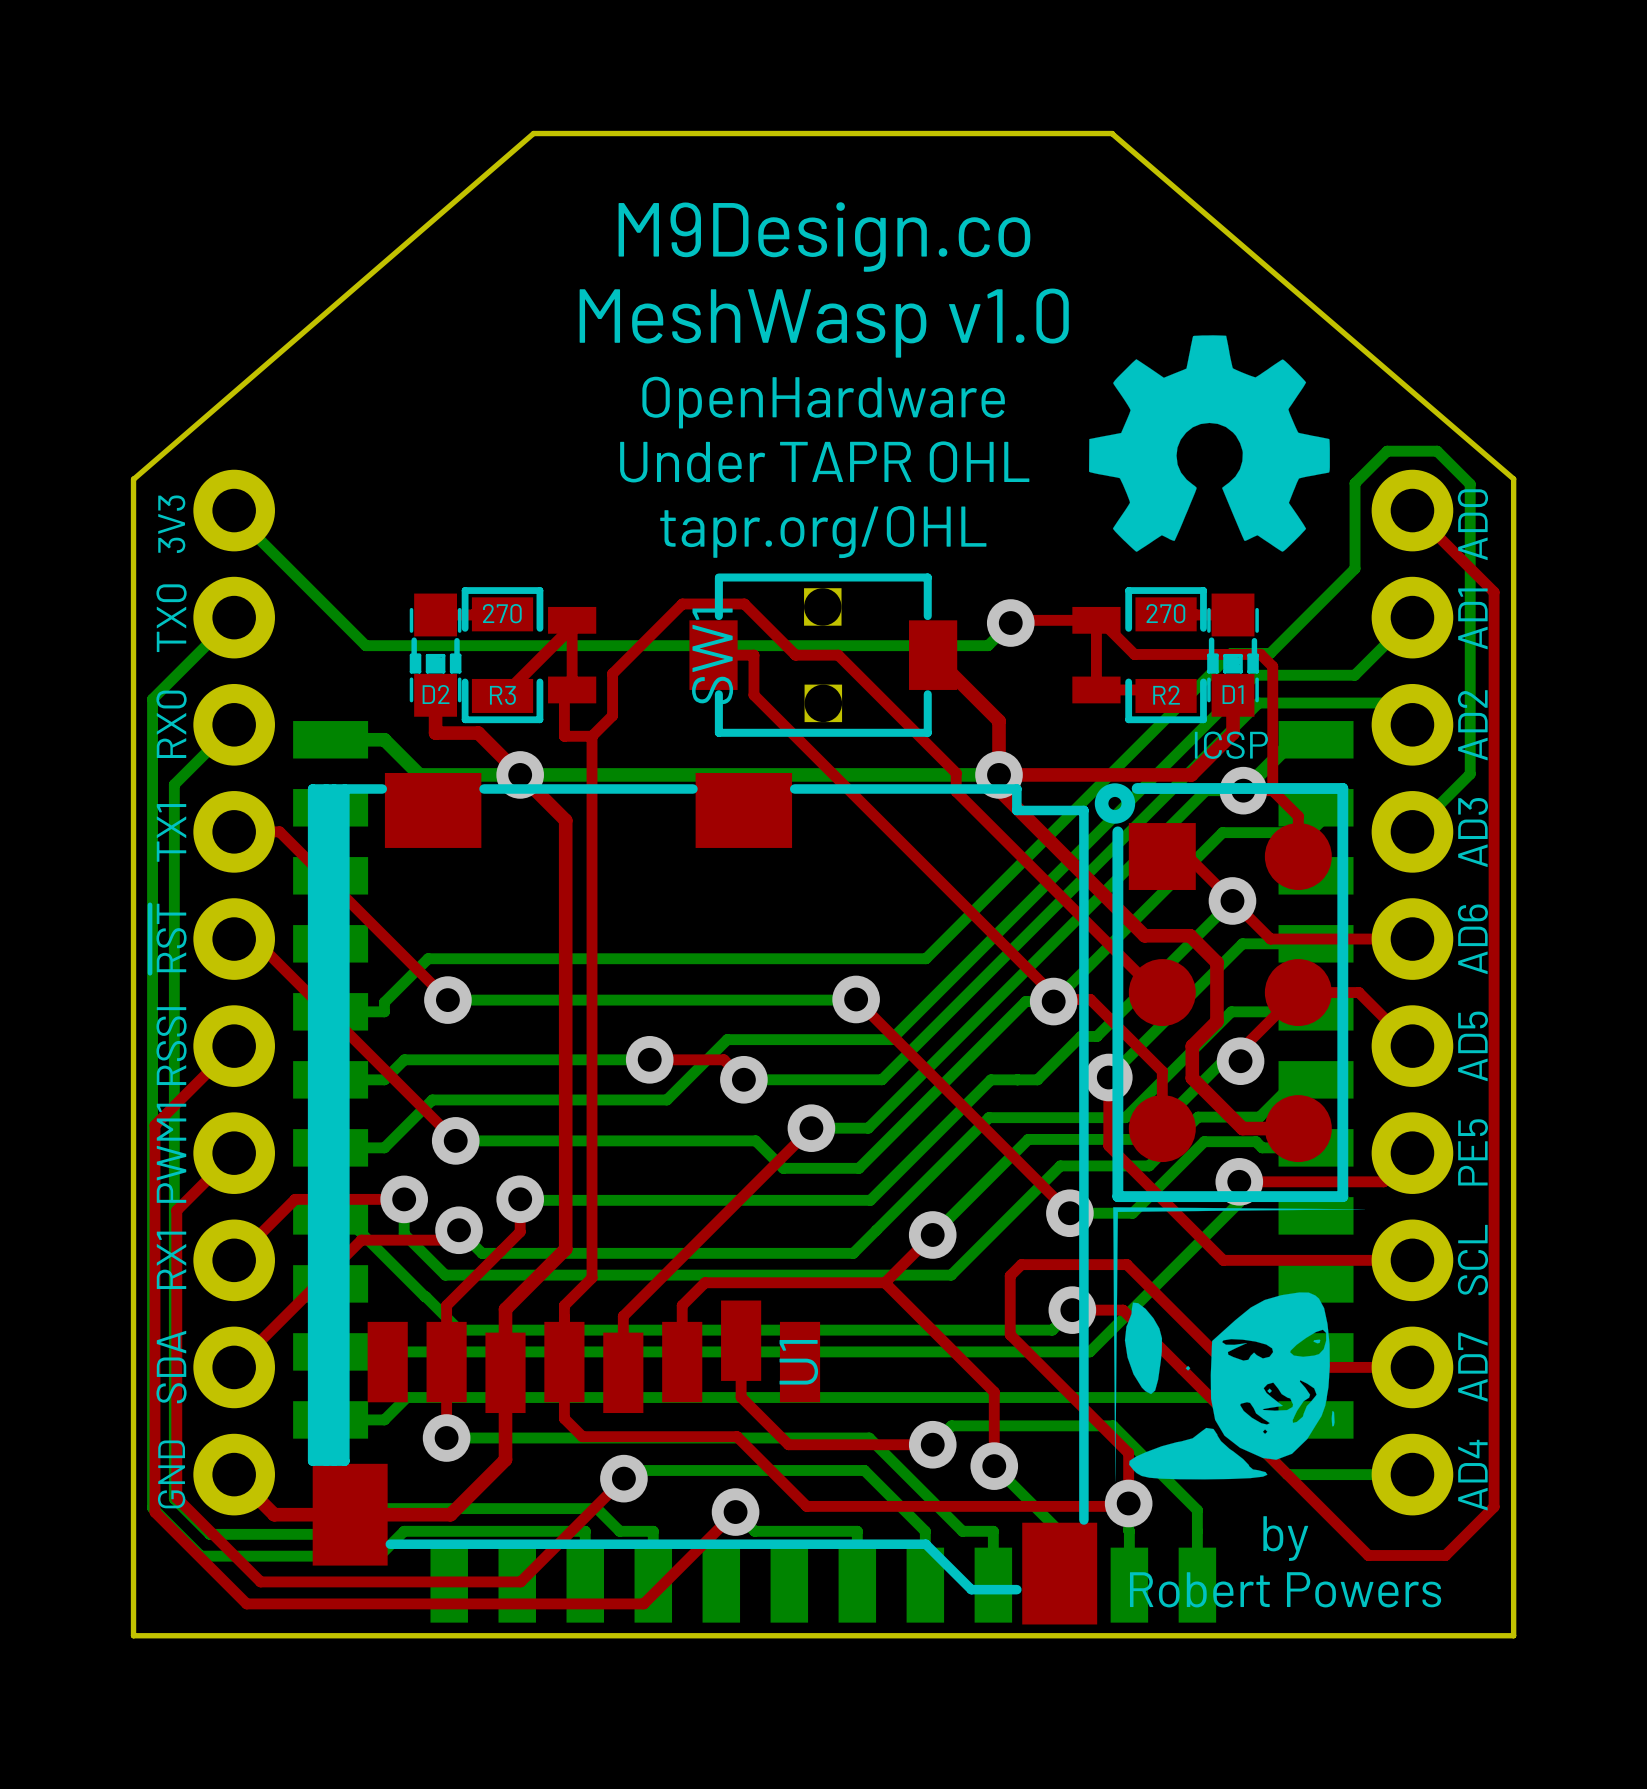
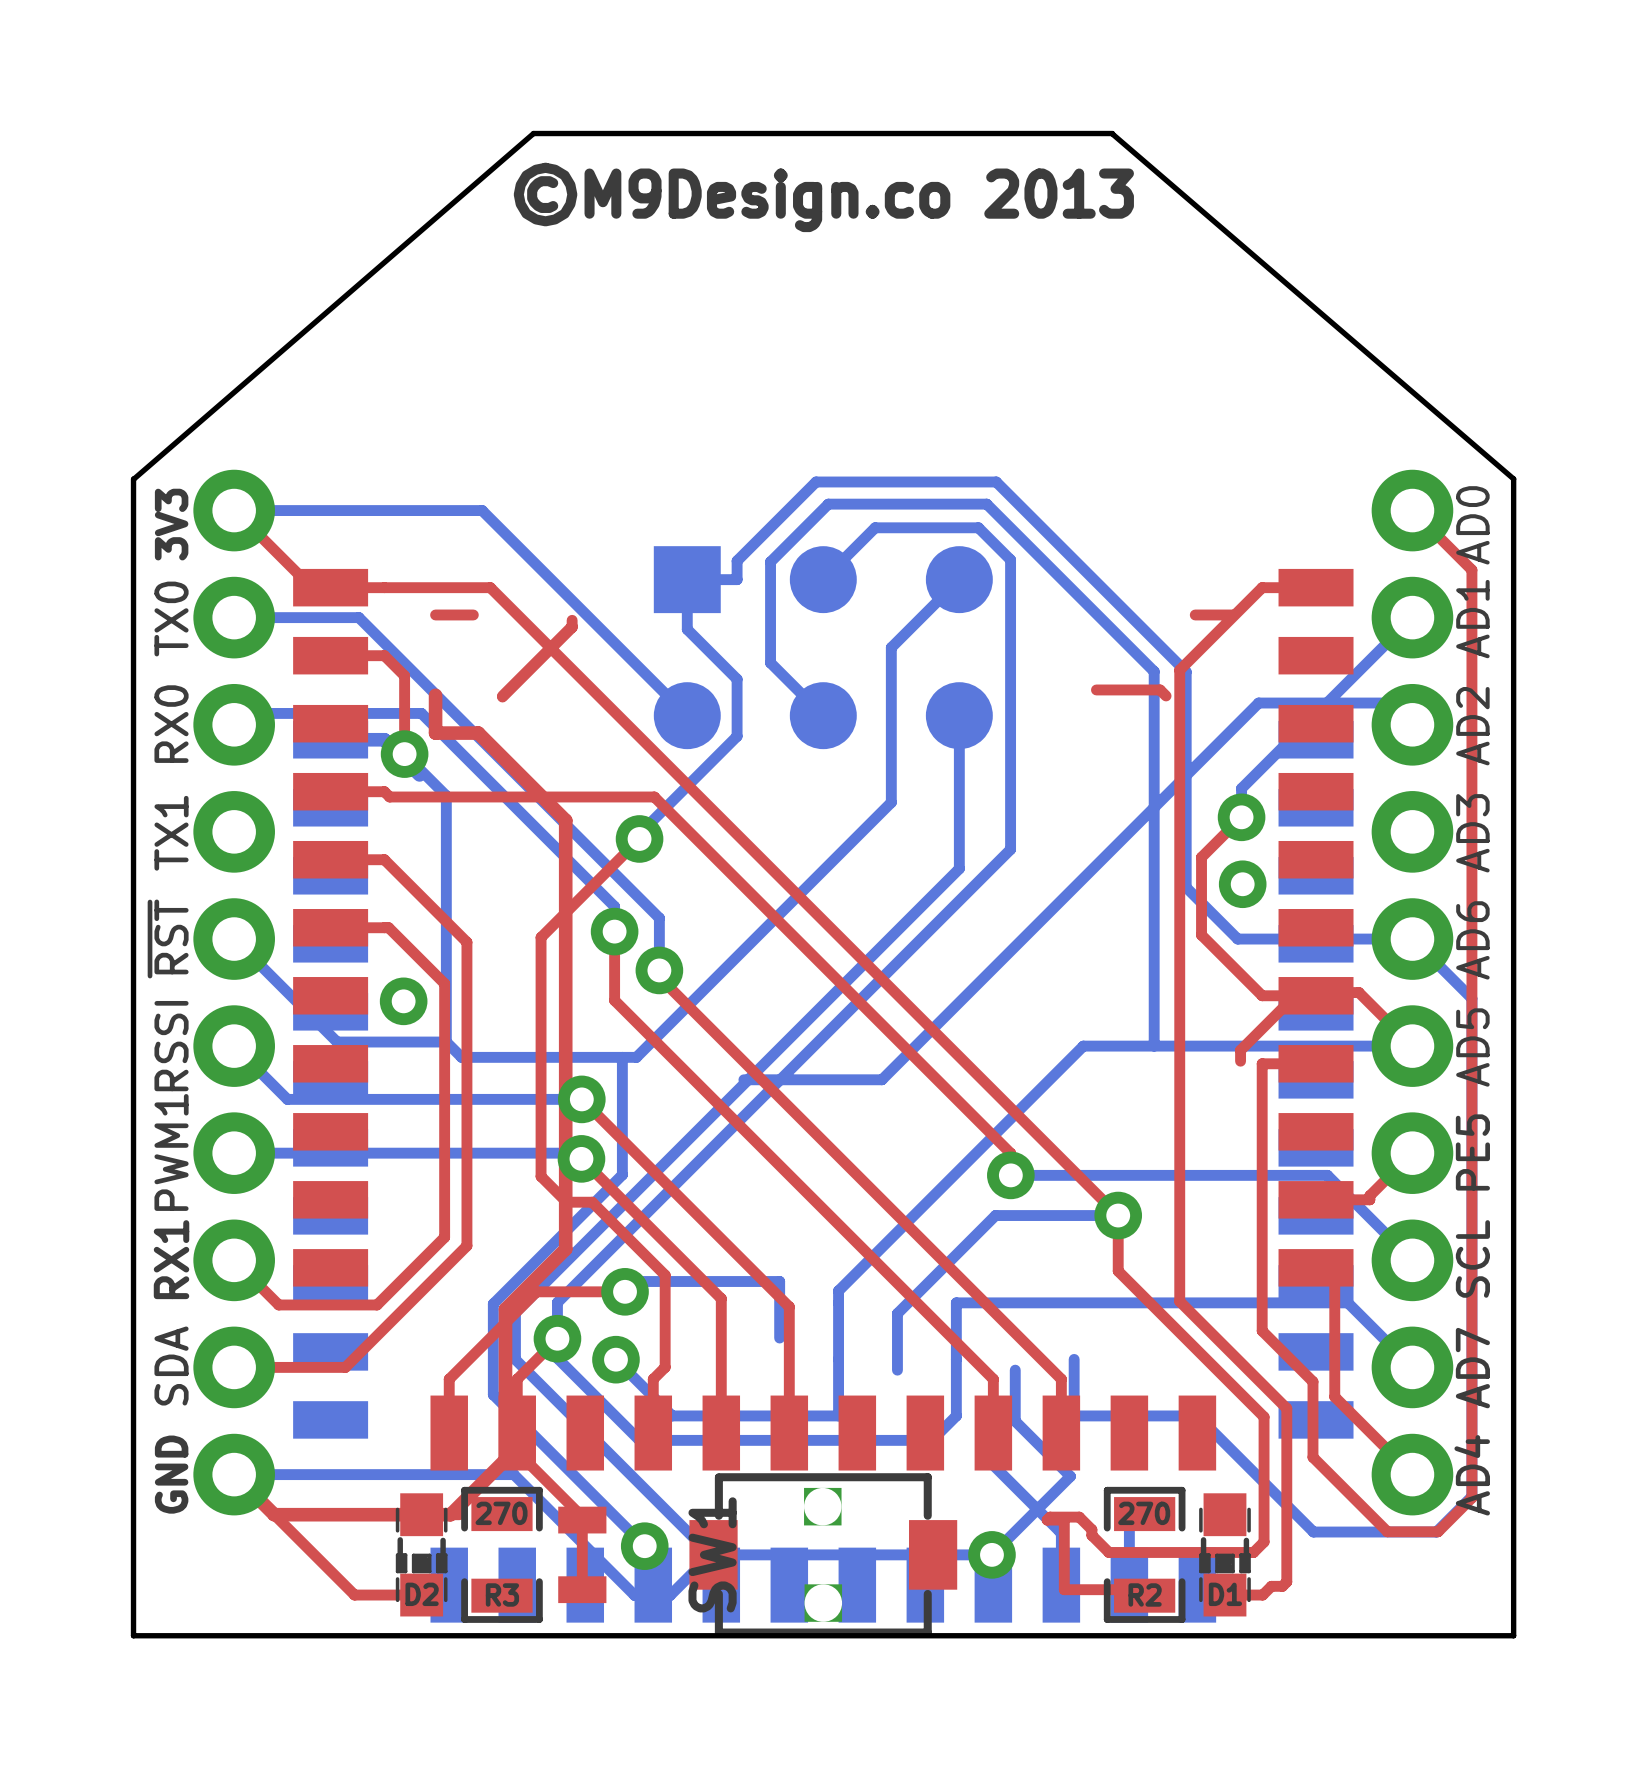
text: M9Design.co (824, 237) -> ©M9Design.co 2013 (823, 197)
text: MeshWasp v1.0 (824, 323) -> none
drawing: [1088, 335, 1330, 552] -> none
text: OpenHardware (823, 402) -> none
text: Under TAPR OHL (824, 461) -> none
bottom track: (234, 510) (234, 514) (365, 645) (988, 645) (1010, 623) -> (234, 510) (482, 510) (687, 715)
top track: none -> (234, 510) (311, 587) (490, 587) (1118, 1215) (1118, 1271) (1264, 1416) (1264, 1542) (1253, 1552) (1108, 1552) (1091, 1535) (1091, 1529) (1079, 1517) (1050, 1517) (1047, 1520) (1064, 1520) (1064, 1589) (1138, 1589)
text: tapr.org/OHL (823, 532) -> none
top track: (1471, 570) (1494, 592) (1494, 1506) (1445, 1555) (1368, 1555) (1123, 1310) (1072, 1310) -> (1471, 570) (1471, 1497) (1438, 1531) (1387, 1531) (1312, 1457) (1312, 1381) (1262, 1330) (1262, 1063) (1334, 1063)
bottom track: none -> (823, 579) (875, 527) (978, 527) (1010, 559) (1010, 849) (557, 1302) (557, 1358) (639, 1440) (931, 1440) (956, 1415) (956, 1302) (1347, 1302) (1412, 1367)
bottom track: none -> (959, 579) (891, 647) (891, 802) (636, 1057) (461, 1057) (446, 1042)
top track: none -> (1334, 587) (1262, 587) (1179, 670) (1179, 1301) (1286, 1408) (1286, 1581) (1282, 1586) (1271, 1586) (1262, 1595) (1224, 1595)
bottom track: (234, 617) (152, 699) (152, 1507) (200, 1556) (379, 1556) (404, 1531) (585, 1531) (585, 1603) -> (234, 617) (358, 617) (659, 918) (659, 970)
top track: (1010, 623) (1013, 620) (1100, 620) (1134, 654) (1260, 654) (1272, 666) (1272, 790) -> none
via: (1010, 623) -> none
top track: none -> (311, 655) (384, 655) (404, 675) (404, 754)
D2 position: (435, 655) -> (421, 1554)
R3 position: (502, 655) -> (501, 1554)
part: (572, 655) -> none
top track: (713, 655) (753, 655) (753, 695) (1057, 998) -> none
SW1 position: (823, 655) -> (823, 1554)
part: (1096, 655) -> none
R2 position: (1166, 655) -> (1144, 1554)
D1 position: (1233, 655) -> (1224, 1554)
bottom track: (1354, 675) (1255, 675) (891, 1039) (727, 1039) (666, 1099) (432, 1099) (384, 1147) (311, 1147) -> (1354, 675) (1241, 788) (1241, 817)
top track: (572, 689) (564, 697) (564, 736) (592, 736) -> none
top track: (1233, 695) (1233, 733) (1191, 774) (999, 774) -> none
bottom track: none -> (823, 715) (770, 662) (770, 561) (828, 504) (986, 504) (1154, 671) (1154, 1046)
bottom track: none -> (959, 715) (959, 868) (515, 1312) (515, 1359) (710, 1554)
top track: (999, 721) (933, 655) (999, 721) -> none
top track: (999, 721) (999, 790) (1144, 935) (1190, 935) (1216, 962) (1216, 1021) (1192, 1046) (1192, 1078) (1242, 1128) (1298, 1128) -> none
bottom track: (234, 724) (174, 784) (174, 1498) (209, 1534) (357, 1534) (383, 1508) (597, 1508) (619, 1531) (653, 1531) (653, 1603) -> (234, 724) (245, 713) (421, 713) (614, 906) (614, 931)
top track: (592, 736) (592, 1277) (564, 1305) (564, 1418) (582, 1436) (737, 1436) (806, 1506) (1125, 1506) (1128, 1503) (1128, 1453) (1010, 1334) (1010, 1275) (1021, 1264) (1126, 1264) (1229, 1367) (1412, 1367) -> none
top track: (592, 736) (612, 715) (612, 673) (682, 603) (744, 603) (795, 655) (838, 655) (956, 773) (956, 791) (1157, 992) (1162, 992) -> none
bottom track: (384, 739) (419, 774) (999, 774) -> none
bottom track: (1334, 739) (1294, 739) (1243, 790) (1205, 790) (868, 1128) (811, 1128) -> none
bottom track: none -> (404, 754) (446, 795) (446, 1042)
via: none -> (404, 754)
via: (520, 774) -> none
via: (999, 774) -> none
via position: (1243, 790) -> (1241, 817)
top track: (1272, 790) (1298, 816) (1298, 856) -> none
top track: none -> (311, 791) (384, 791) (389, 796) (654, 796) (1010, 1153) (1010, 1175)
bottom track: (1334, 807) (1309, 832) (1222, 832) (1053, 1001) (1025, 1001) (858, 1168) (783, 1168) (755, 1140) (455, 1140) -> none
top track: none -> (1241, 817) (1201, 857) (1201, 935) (1262, 995) (1334, 995)
top track: (234, 831) (279, 831) (447, 1000) -> none
bottom track: (1412, 831) (1470, 774) (1470, 484) (1437, 451) (1387, 451) (1355, 483) (1355, 568) (1270, 653) (1231, 653) (926, 958) (428, 958) (384, 1002) (384, 1011) (311, 1011) -> none
bottom track: none -> (639, 838) (639, 833) (737, 736) (737, 679) (687, 629) (687, 579) (737, 579) (737, 560) (816, 481) (996, 481) (1186, 671) (1186, 887) (1237, 939) (1412, 939) (1471, 998) (1471, 1496) (1436, 1532) (1313, 1532) (1197, 1415) (1074, 1415) (1074, 1359)
top track: none -> (639, 838) (541, 937) (541, 1176) (566, 1202) (592, 1202) (665, 1275) (665, 1367) (653, 1379) (653, 1451)
via: none -> (639, 838)
top track: (1162, 856) (1188, 856) (1270, 939) (1412, 939) -> none
bottom track: (1232, 900) (1096, 1036) (1080, 1036) (1037, 1079) (990, 1079) (870, 1200) (520, 1199) -> none
via position: (1232, 900) -> (1242, 884)
top track: none -> (614, 931) (614, 1000) (993, 1379) (993, 1451)
via: none -> (614, 931)
bottom track: none -> (234, 939) (337, 1042) (446, 1042)
top track: (234, 939) (253, 939) (455, 1140) -> none
bottom track: (1334, 943) (1242, 943) (1108, 1077) -> none
top track: none -> (659, 970) (659, 977) (1061, 1379) (1061, 1451)
via: none -> (659, 970)
part side: top (1221, 992) -> bottom (823, 647)
top track: (1057, 998) (1090, 999) (1162, 1071) (1162, 1128) -> none
top track: (856, 999) (1069, 1213) -> none
via: (856, 999) -> none
bottom track: (447, 1000) (855, 1000) -> none
via position: (447, 1000) -> (403, 1001)
via: (1053, 1001) -> none
bottom track: (1334, 1011) (1231, 1011) (1125, 1117) (989, 1117) (853, 1253) (482, 1253) (459, 1230) -> none
part: none -> (823, 1019)
bottom track: none -> (234, 1046) (287, 1099) (581, 1099)
top track: (234, 1046) (154, 1125) (154, 1512) (246, 1603) (643, 1603) (735, 1512) -> none
bottom track: none -> (1412, 1046) (1083, 1046) (838, 1290) (838, 1415) (672, 1415) (615, 1359)
bottom track: none -> (622, 1057) (622, 1174) (493, 1303) (493, 1394) (644, 1546)
bottom track: (649, 1059) (404, 1059) (384, 1079) (311, 1079) -> none
top track: (649, 1059) (723, 1059) (743, 1079) -> none
via: (649, 1059) -> none
bottom track: (1240, 1061) (1223, 1061) (1144, 1139) (1028, 1139) (932, 1234) -> none
via: (1240, 1061) -> none
top track: (1108, 1077) (1108, 1145) (1223, 1260) (1412, 1260) -> none
via: (1108, 1077) -> none
via: (743, 1079) -> none
bottom track: (1334, 1079) (1296, 1079) (1259, 1117) (1198, 1117) (1149, 1165) (1060, 1165) (951, 1275) (445, 1275) (404, 1234) (404, 1199) -> none
top track: none -> (581, 1099) (789, 1306) (789, 1451)
via: none -> (581, 1099)
top track: (811, 1128) (623, 1316) (623, 1372) -> none
via: (811, 1128) -> none
via: (455, 1140) -> none
bottom track: (1334, 1147) (1262, 1147) (1256, 1141) (1204, 1141) (1132, 1213) (1069, 1213) -> none
bottom track: none -> (234, 1153) (575, 1153) (581, 1158)
top track: (234, 1153) (176, 1210) (176, 1498) (260, 1581) (520, 1581) (623, 1478) -> none
top track: none -> (581, 1158) (721, 1298) (721, 1451)
via: none -> (581, 1158)
bottom track: none -> (1010, 1175) (1327, 1175) (1412, 1260)
via: none -> (1010, 1175)
bottom track: (1239, 1181) (1239, 1202) (1089, 1351) (311, 1351) -> none
top track: (1239, 1181) (1383, 1181) -> (1334, 1199) (1369, 1199) (1369, 1195) (1383, 1181)
via: (1239, 1181) -> none
U1: (702, 1198) -> none
top track: (404, 1199) (295, 1199) (234, 1260) -> (311, 927) (388, 927) (444, 983) (444, 1237) (377, 1304) (278, 1304) (234, 1260)
via: (404, 1199) -> none
top track: (520, 1199) (520, 1231) (446, 1305) (446, 1438) -> none
via: (520, 1199) -> none
drawing: [1113, 1207, 1365, 1482] -> none
via: (1069, 1213) -> none
bottom track: (311, 1215) (344, 1215) (425, 1296) -> none
bottom track: none -> (1118, 1215) (995, 1215) (897, 1313) (897, 1370)
via: none -> (1118, 1215)
top track: (459, 1230) (449, 1240) (361, 1240) (234, 1367) -> (311, 859) (384, 859) (466, 942) (466, 1245) (345, 1367) (234, 1367)
via: (459, 1230) -> none
top track: (932, 1234) (884, 1282) -> none
via: (932, 1234) -> none
top track: none -> (1334, 1267) (1334, 1396) (1412, 1474)
top track: (884, 1282) (705, 1282) (682, 1305) (682, 1362) -> none
top track: (884, 1282) (994, 1392) (994, 1466) -> none
bottom track: none -> (625, 1291) (635, 1281) (779, 1281) (779, 1338)
top track: none -> (625, 1291) (536, 1291) (449, 1379) (449, 1451)
via: none -> (625, 1291)
bottom track: (425, 1296) (459, 1330) (1052, 1330) (1072, 1310) -> none
via: (1072, 1310) -> none
via: none -> (557, 1338)
top track: none -> (557, 1339) (517, 1379) (517, 1451) (582, 1516) (582, 1520)
top track: (741, 1340) (741, 1397) (788, 1444) (932, 1444) -> none
via: none -> (615, 1359)
bottom track: none -> (1015, 1370) (1015, 1421) (1070, 1476) (991, 1554) (710, 1554)
bottom track: (311, 1419) (384, 1419) (406, 1397) (1210, 1397) (1287, 1474) (1412, 1474) -> none
bottom track: (446, 1438) (869, 1438) (962, 1531) (993, 1531) (993, 1603) -> none
via: (446, 1438) -> none
bottom track: (932, 1444) (951, 1425) (1113, 1425) (1197, 1510) (1197, 1603) -> none
via: (932, 1444) -> none
via: (994, 1466) -> none
bottom track: none -> (234, 1474) (513, 1474) (634, 1595) (670, 1595) (710, 1554)
bottom track: (623, 1478) (632, 1470) (864, 1470) (925, 1531) (925, 1603) -> none
via: (623, 1478) -> none
via: (1128, 1503) -> none
bottom track: (735, 1512) (754, 1531) (857, 1531) (857, 1603) -> none
via: (735, 1512) -> none
top track: none -> (274, 1514) (354, 1595) (421, 1595)
text: by (1285, 1538) -> none
via: none -> (644, 1546)
part: none -> (582, 1554)
via: none -> (991, 1554)
text: Robert Powers (1285, 1589) -> none

